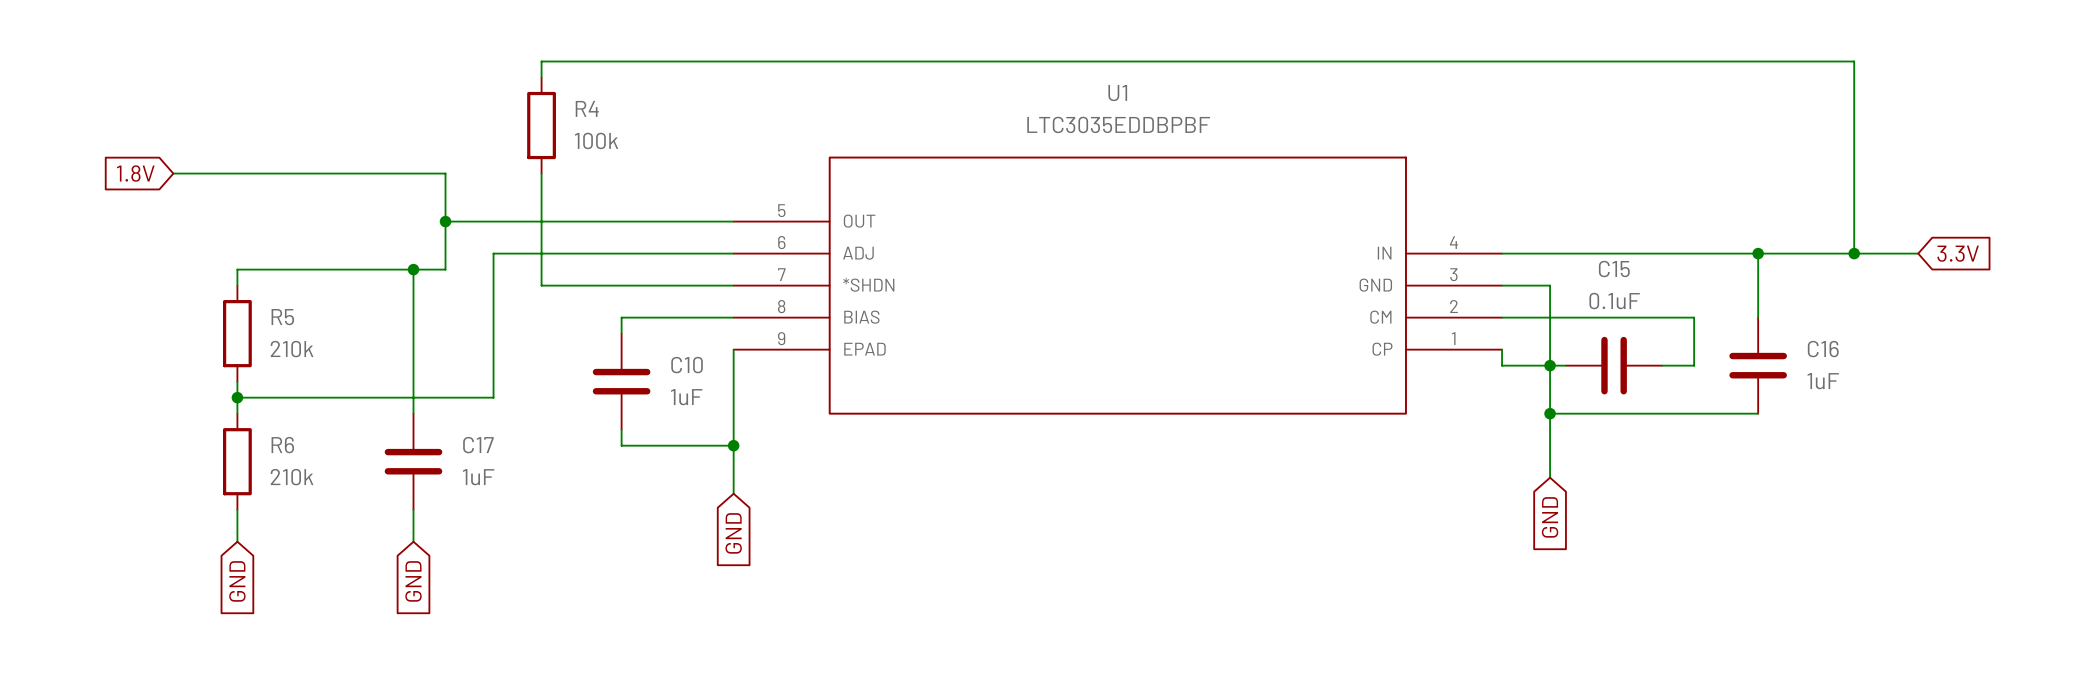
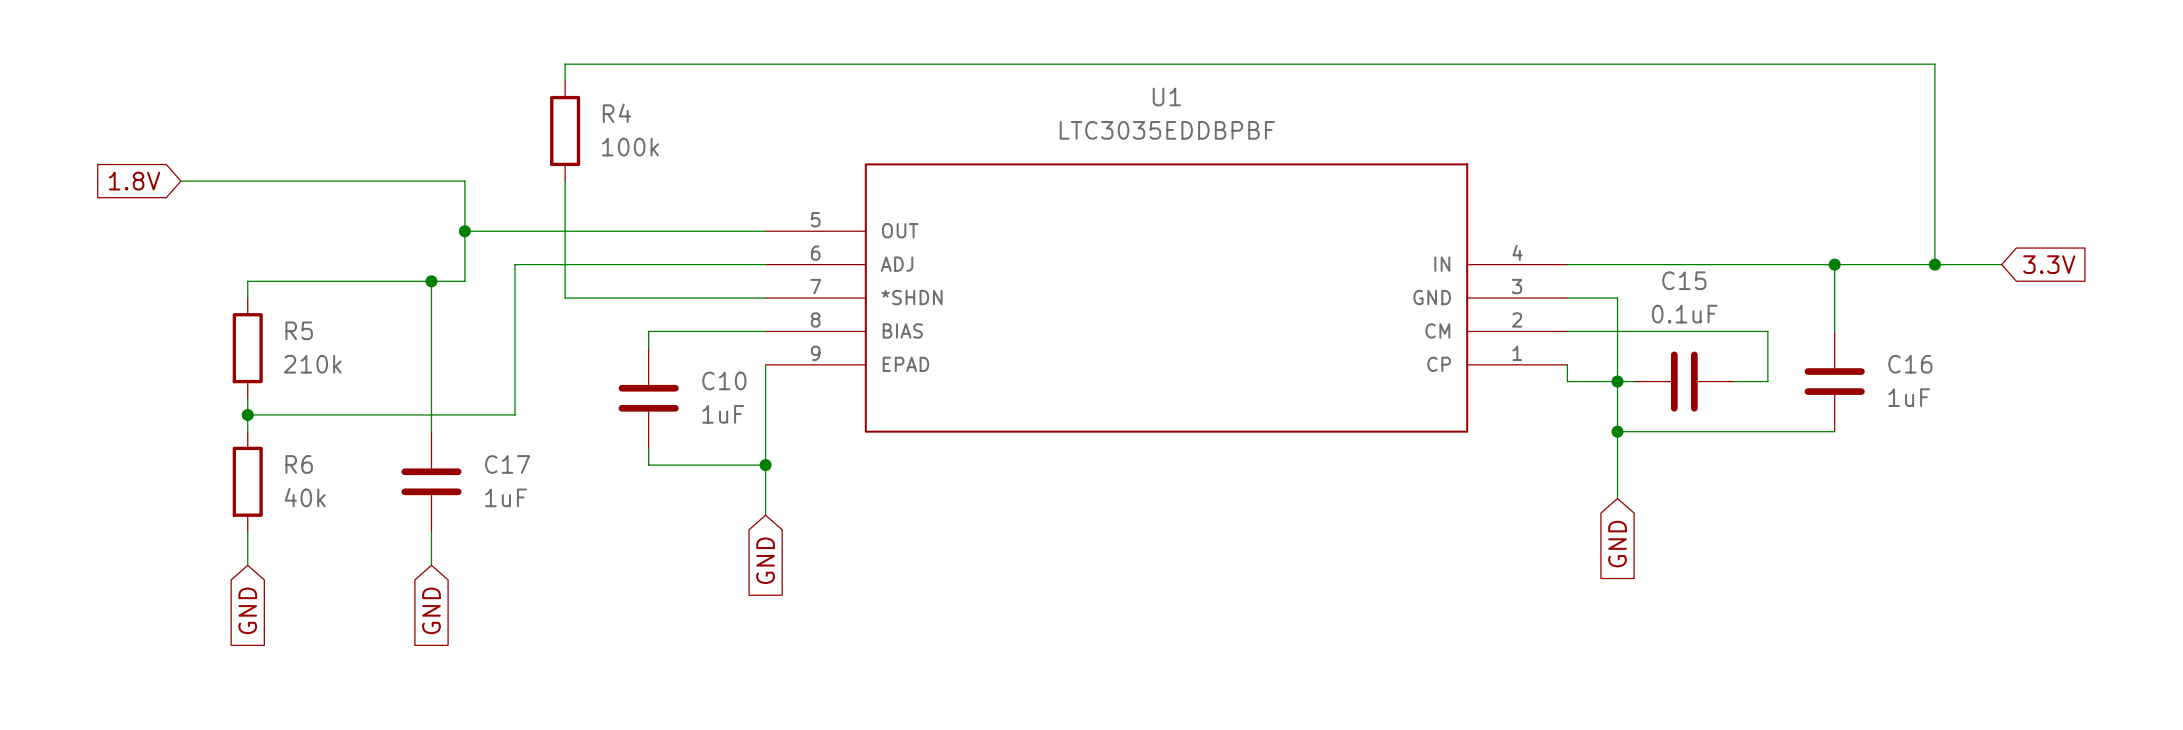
R6 value: 210k (292, 477) -> 40k (305, 497)

